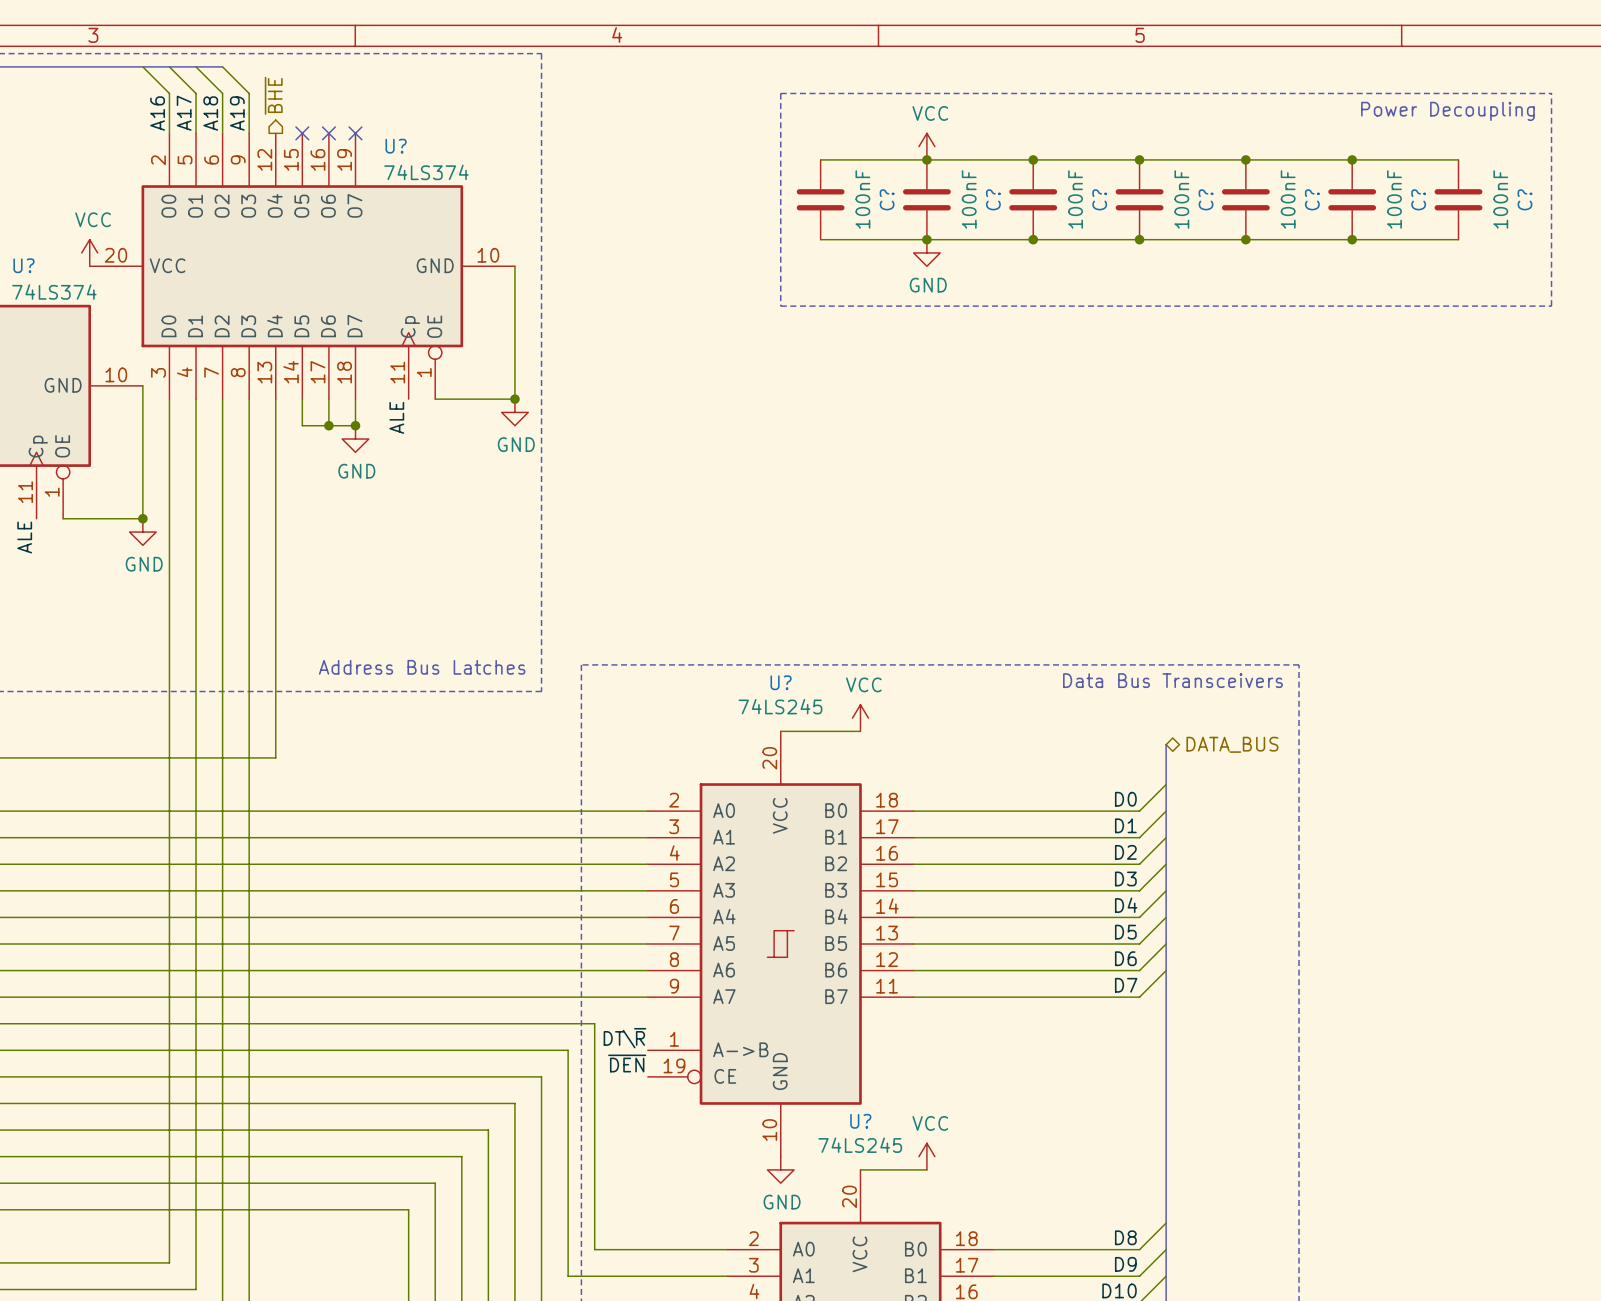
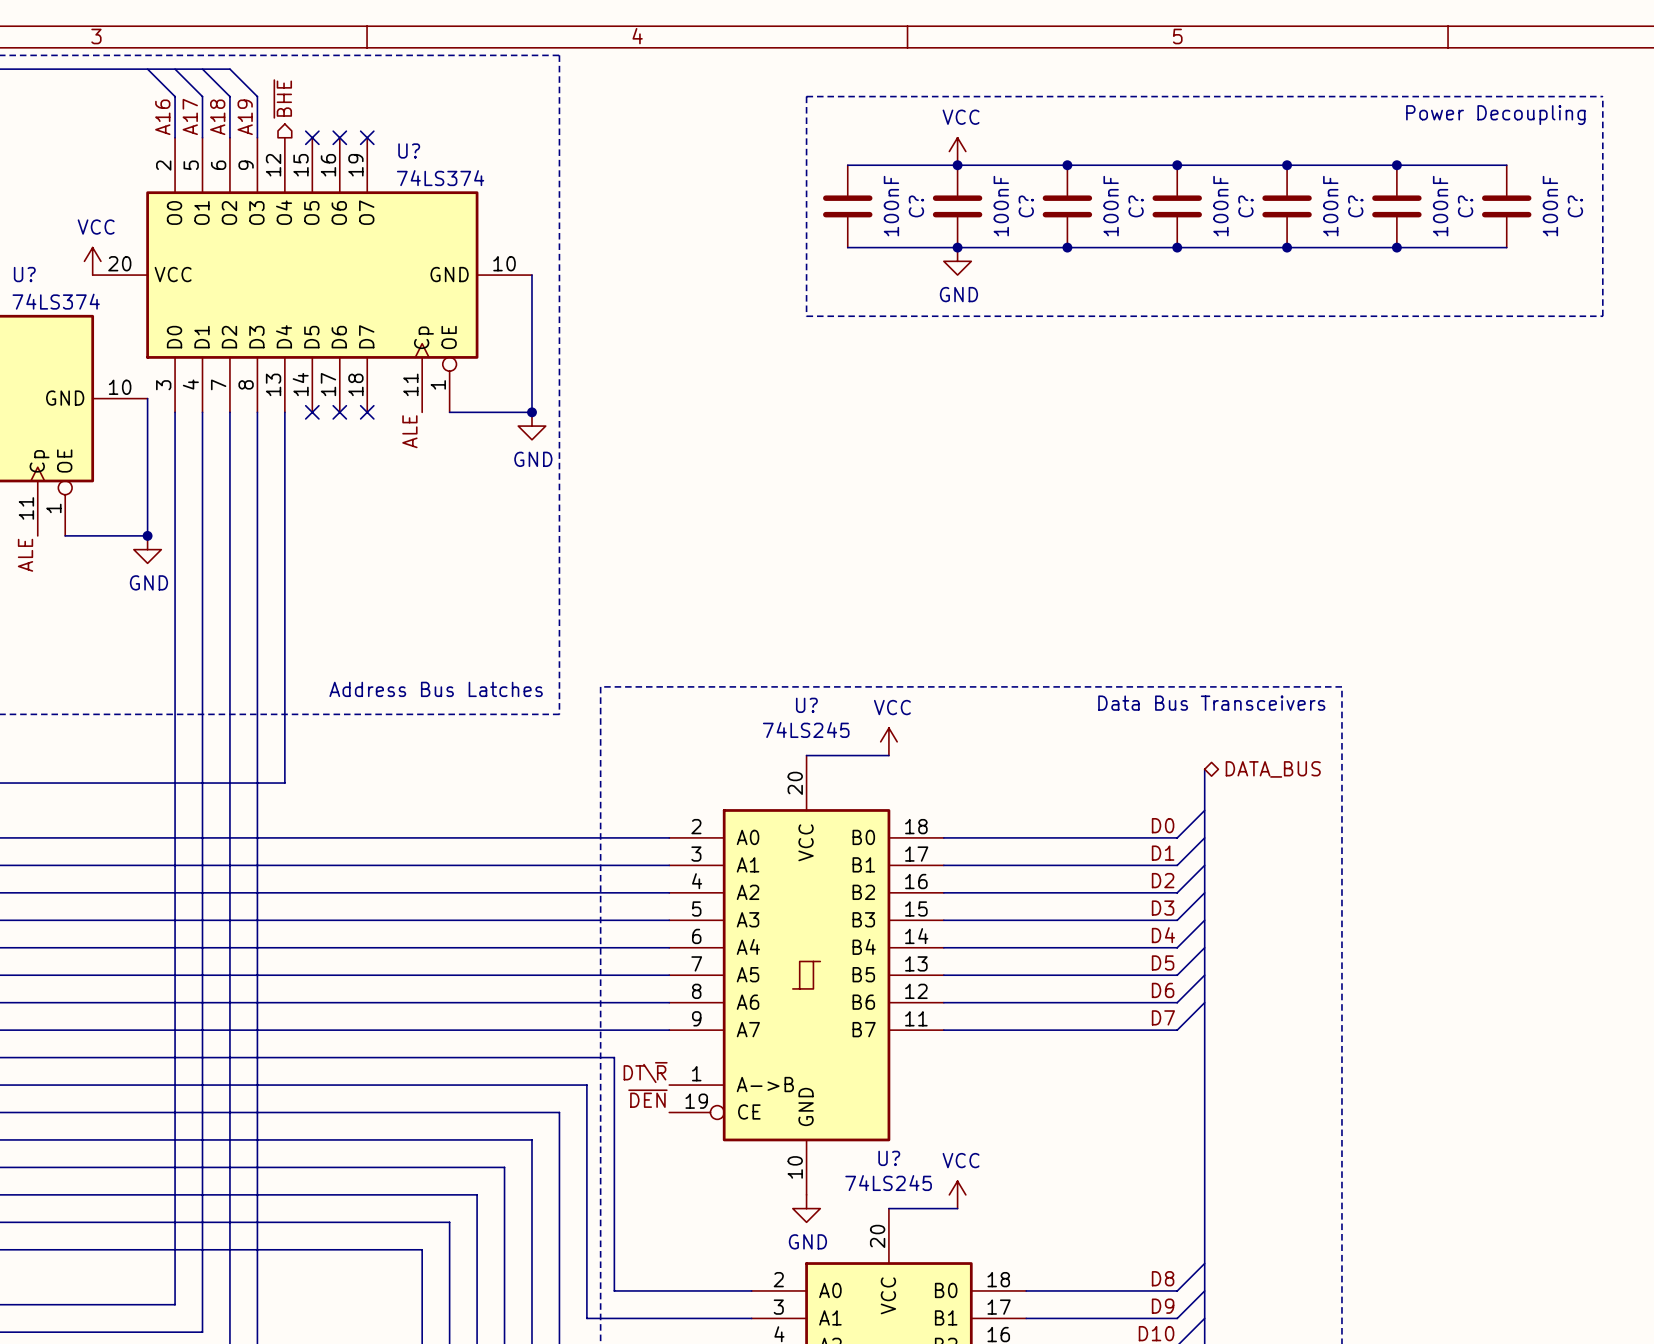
wire: (302, 399) (302, 425) (355, 425) (355, 399) -> none
no-connect mark: none -> (312, 412)
wire: (328, 399) (328, 425) -> none
no-connect mark: none -> (339, 412)
no-connect mark: none -> (367, 412)
junction: (328, 425) -> none
junction: (355, 425) -> none
power symbol: GND (355, 439) -> none

